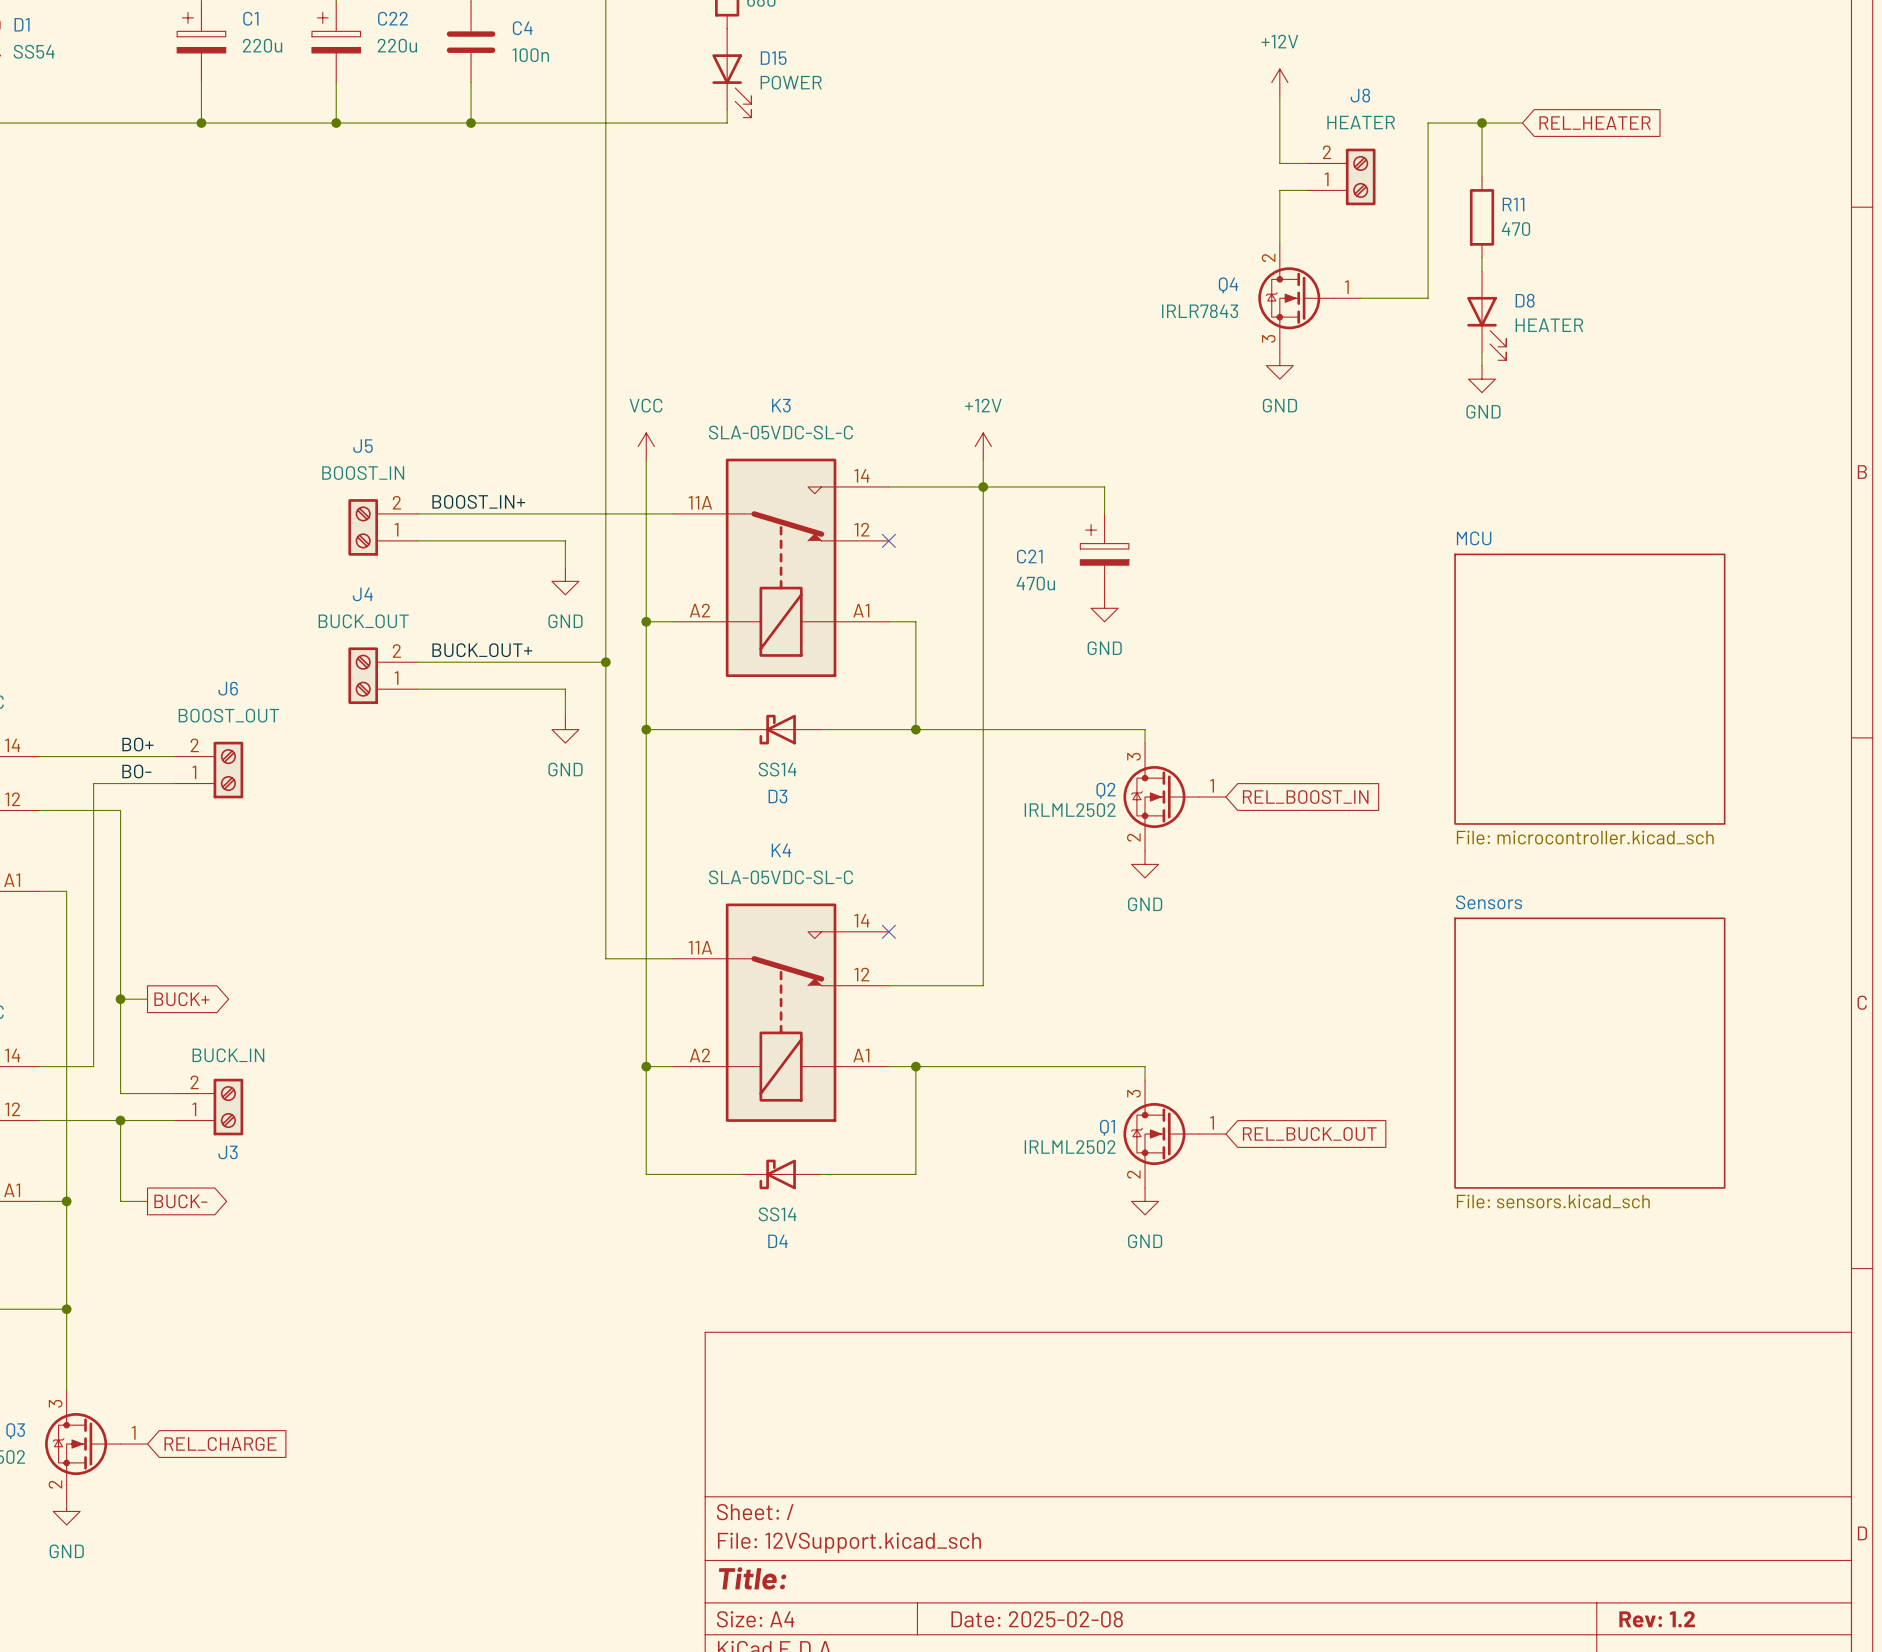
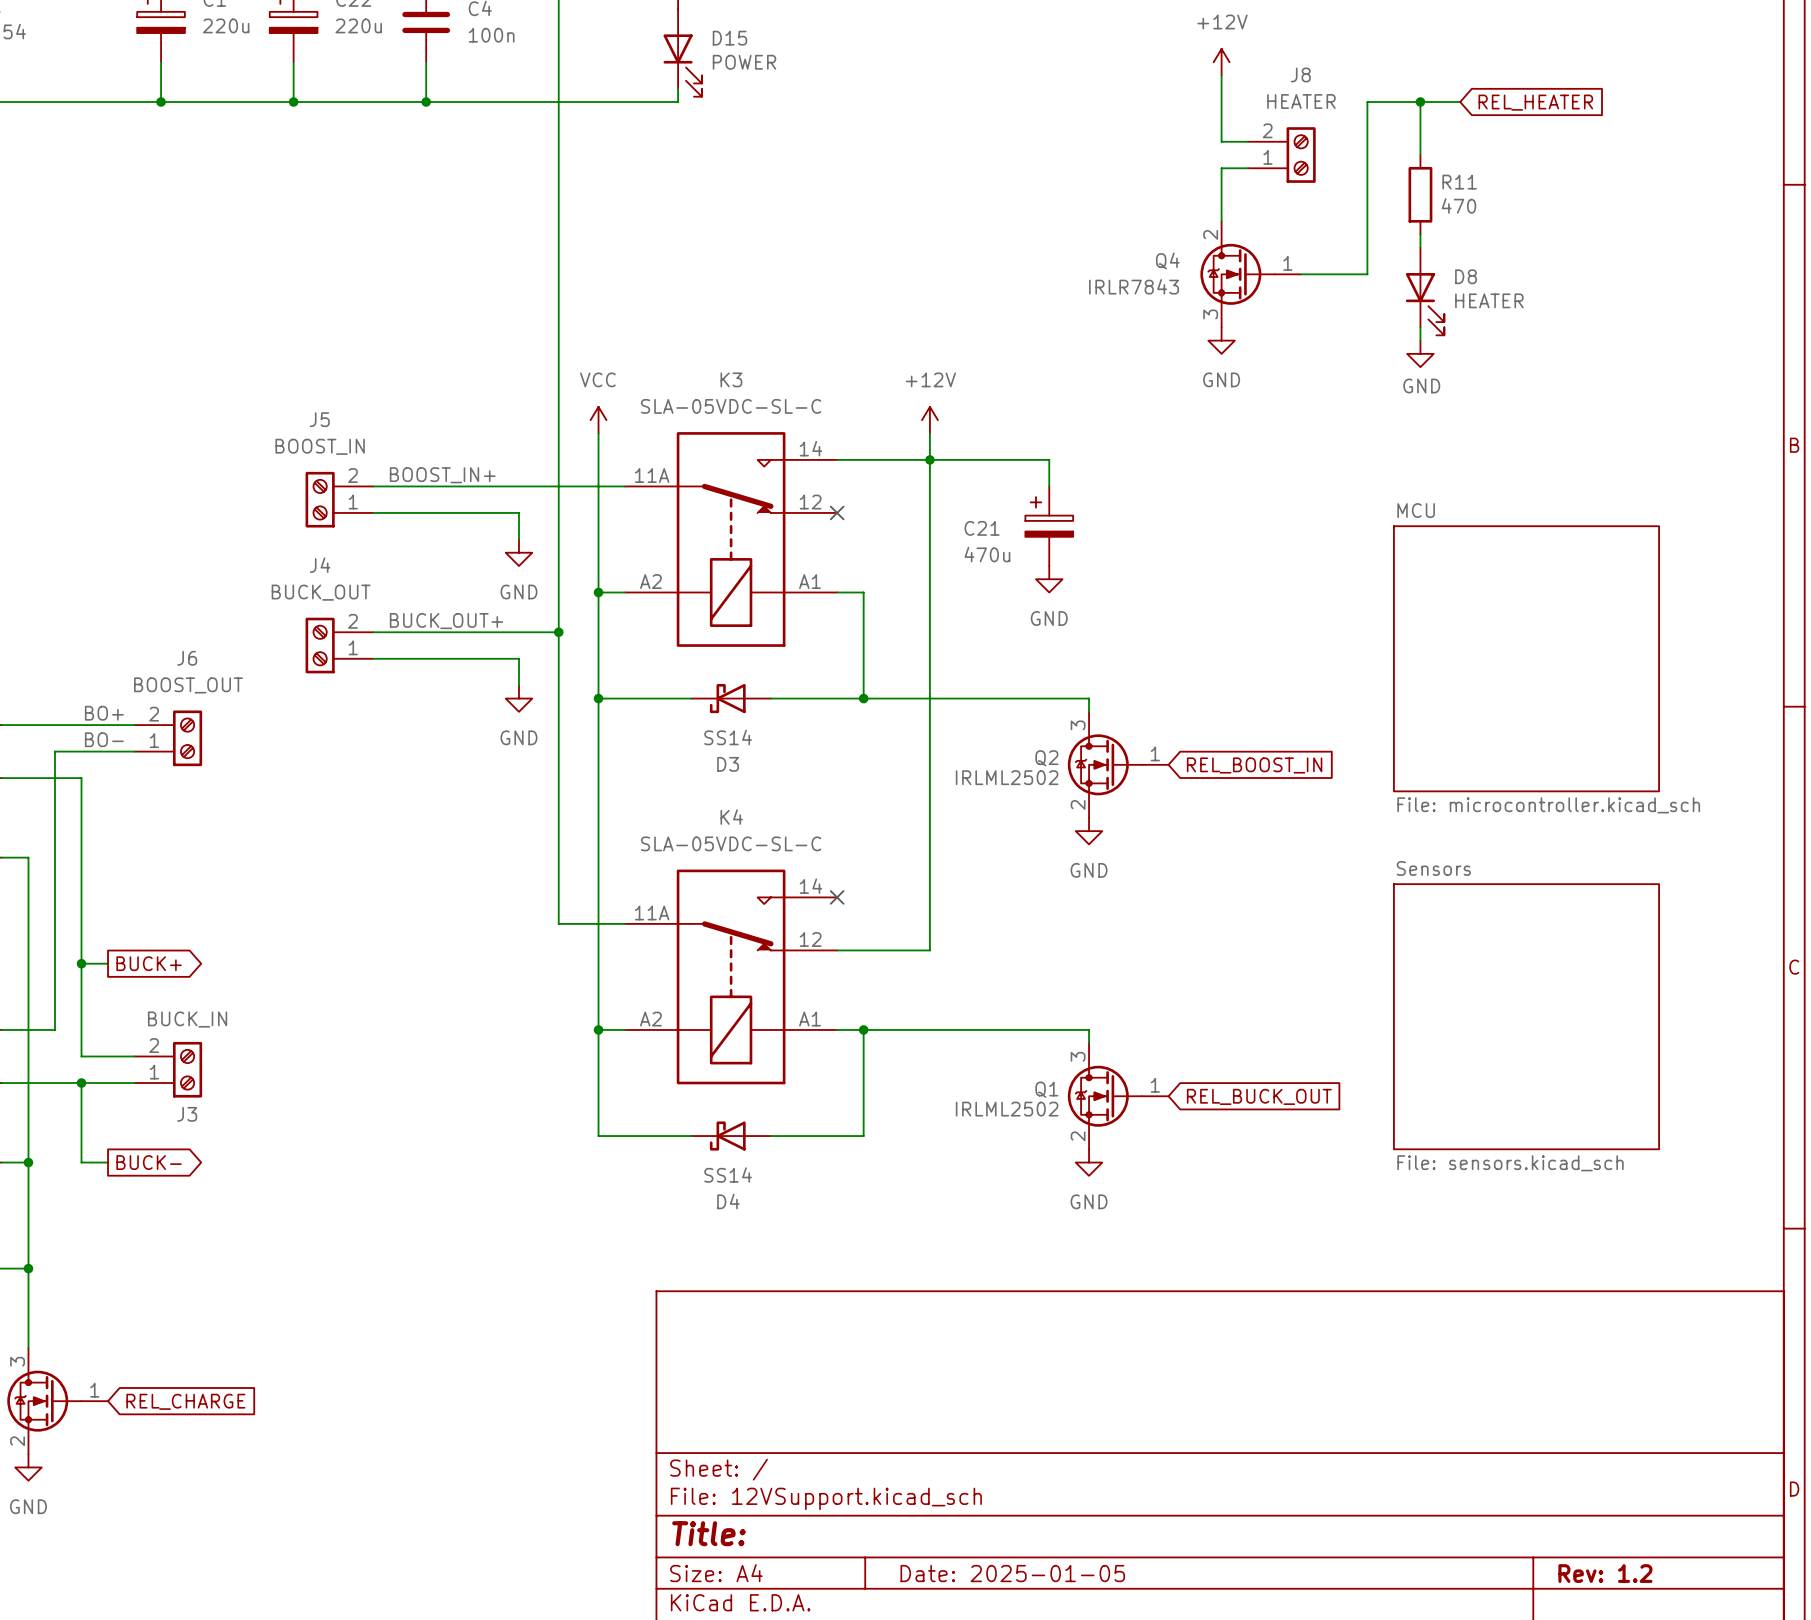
title block: Date: 2025-02-08 (1037, 1619) -> Date: 2025-01-05 (1012, 1573)

